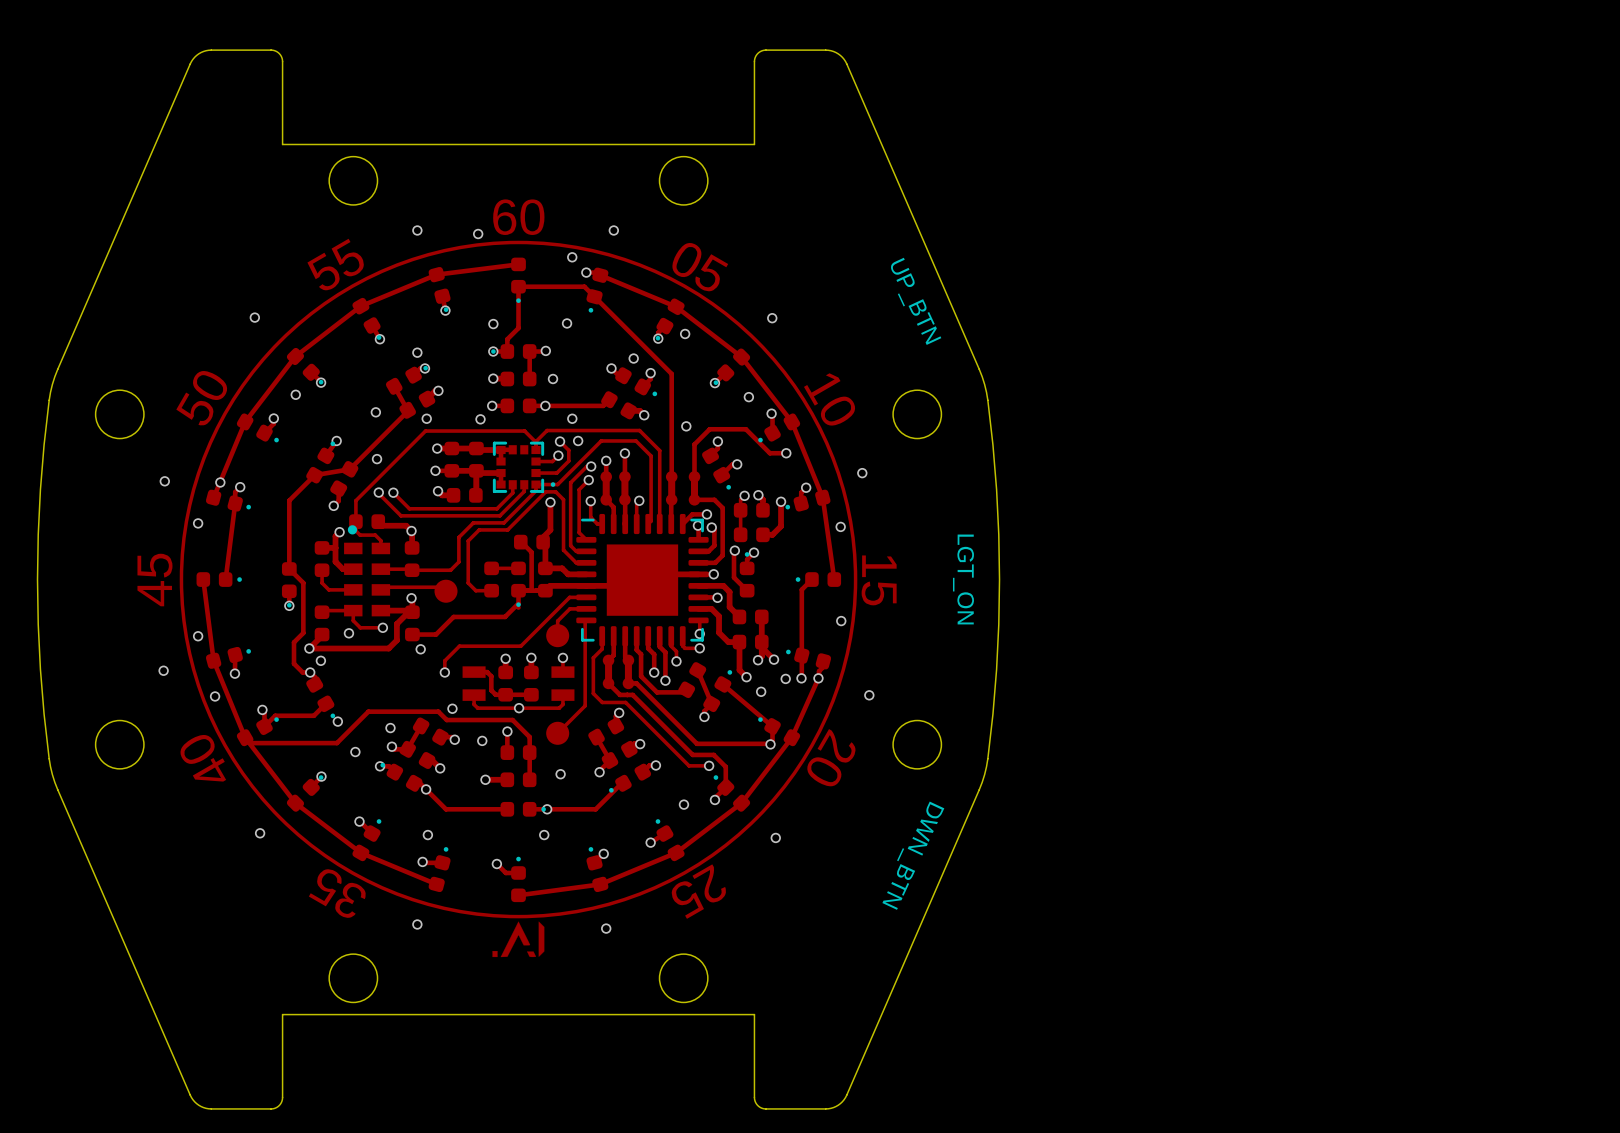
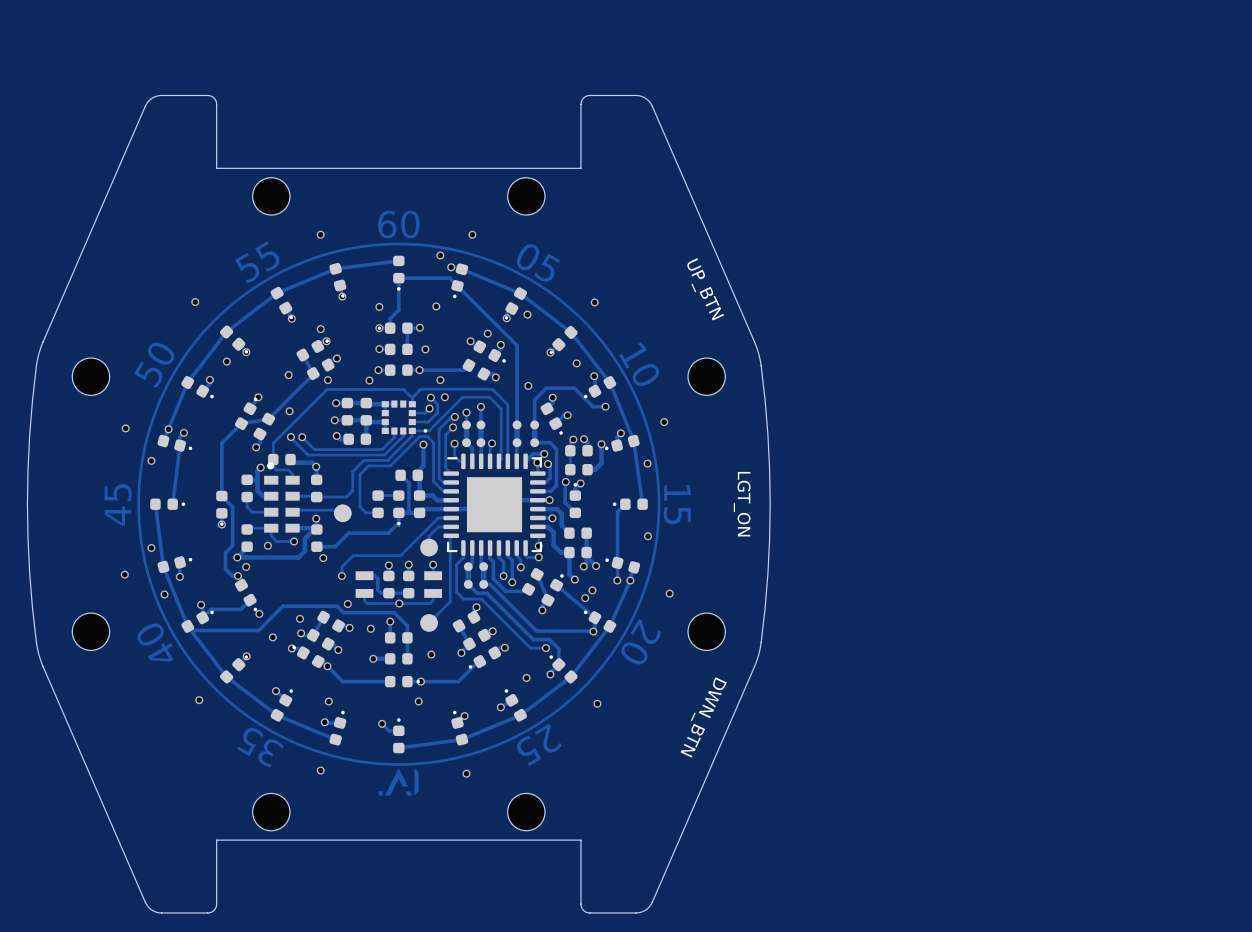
via: (478, 234) -> none
part footprint: [492, 441, 556, 493] -> [381, 400, 428, 435]
via: (785, 678) -> none
via: (761, 691) -> none
via: none -> (592, 590)
via: none -> (585, 598)

